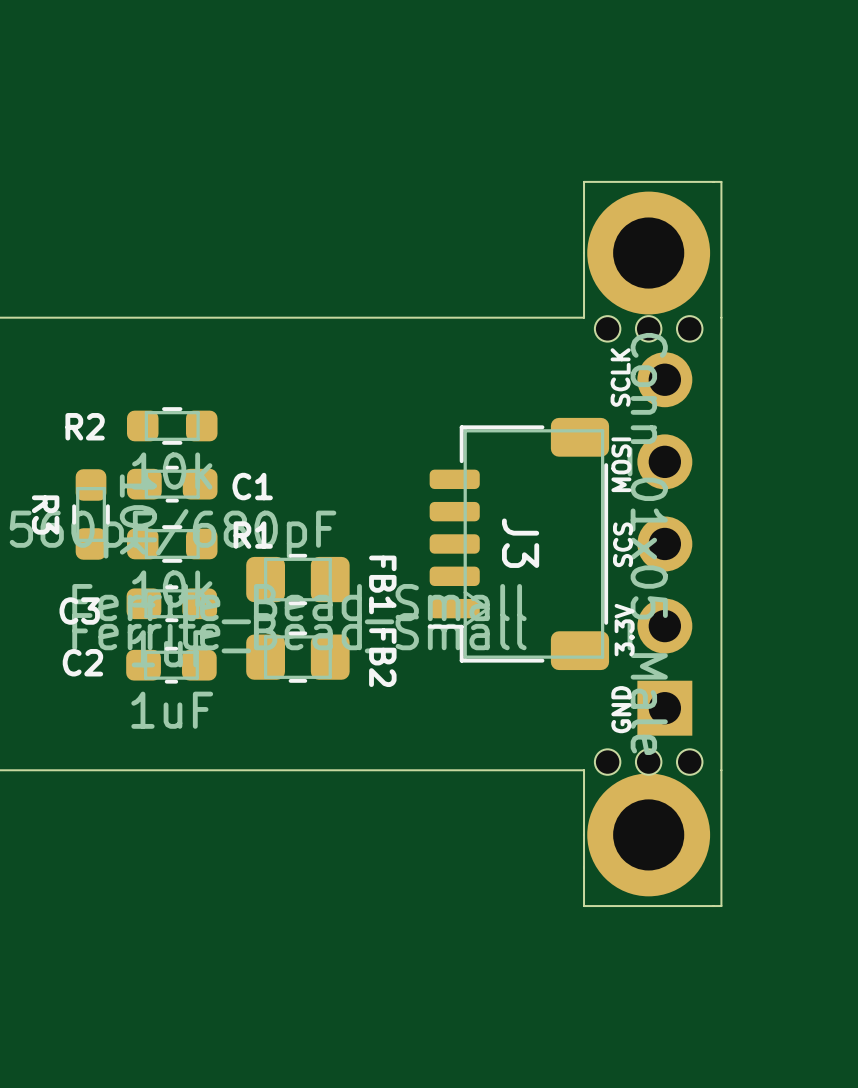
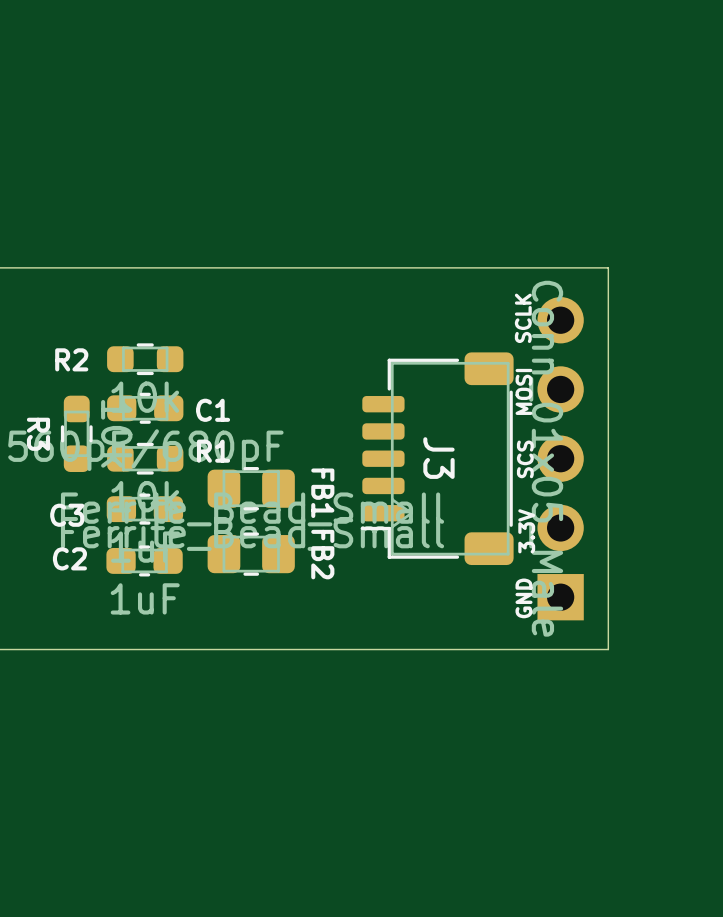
part: (648, 253) -> none
board edge: (721, 317) (721, 181) (584, 181) (584, 317) -> (608, 267) (492, 267)
part: (648, 328) -> none
part: (648, 762) -> none
board edge: (721, 770) (721, 906) (713, 906) (584, 906) (584, 770) -> (608, 649) (492, 649)
part: (648, 834) -> none

